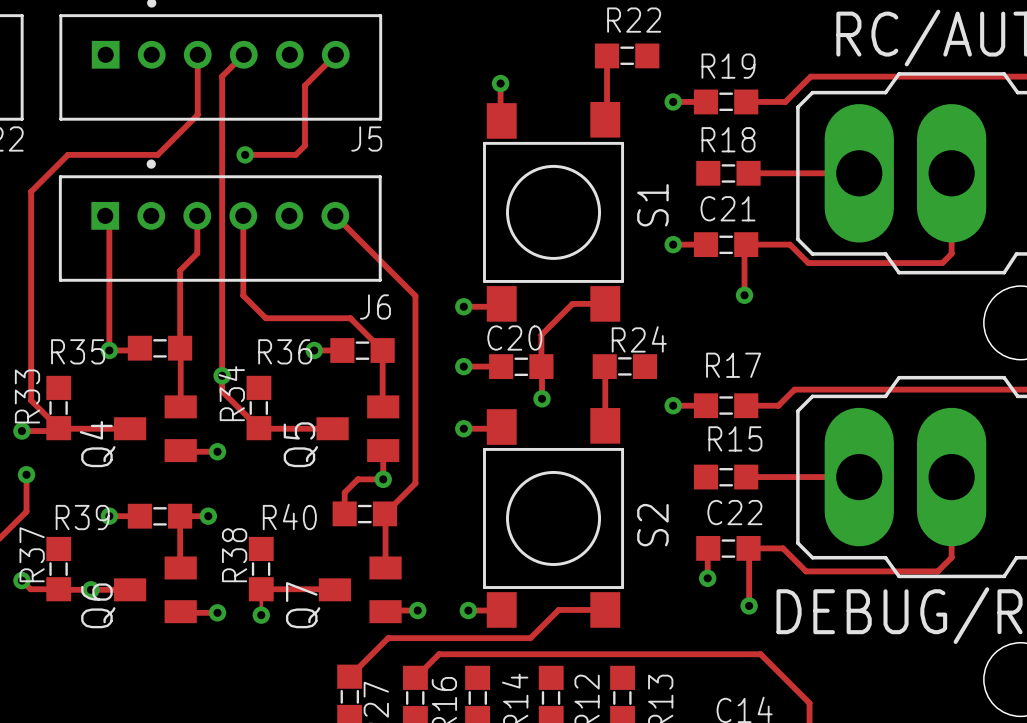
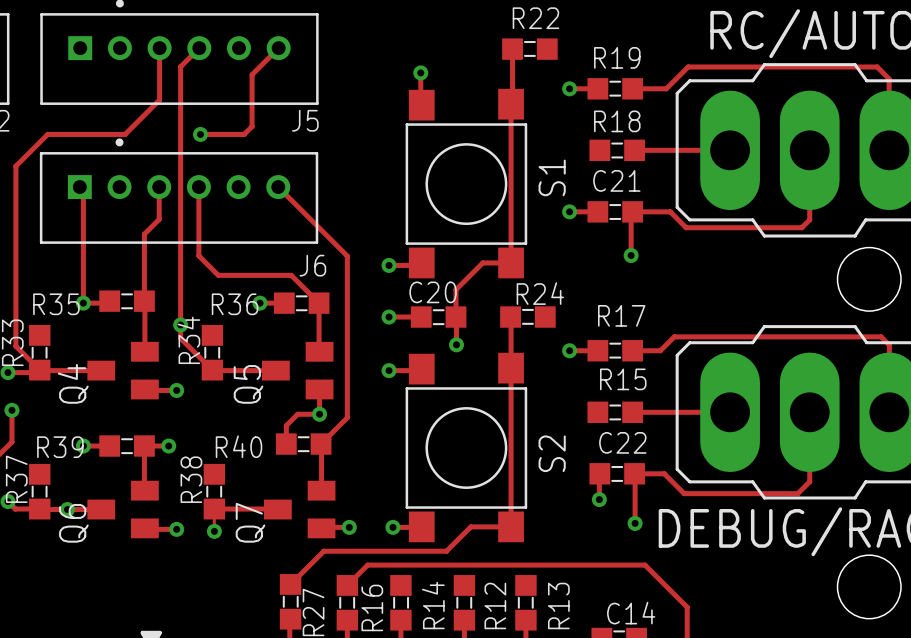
track: none -> (511, 104) (511, 262)
track: none -> (511, 368) (511, 526)

